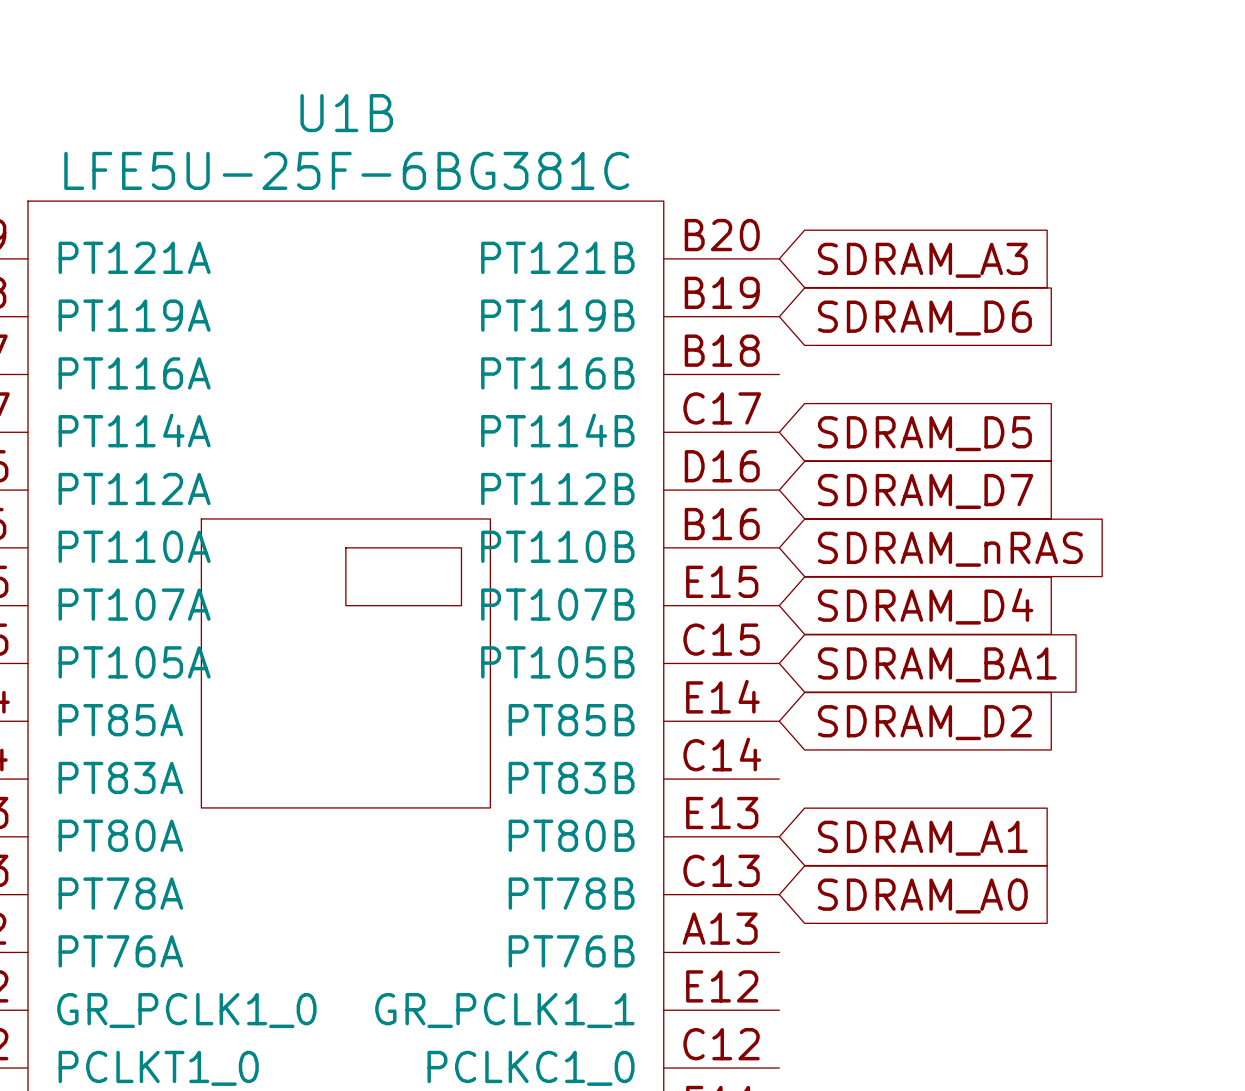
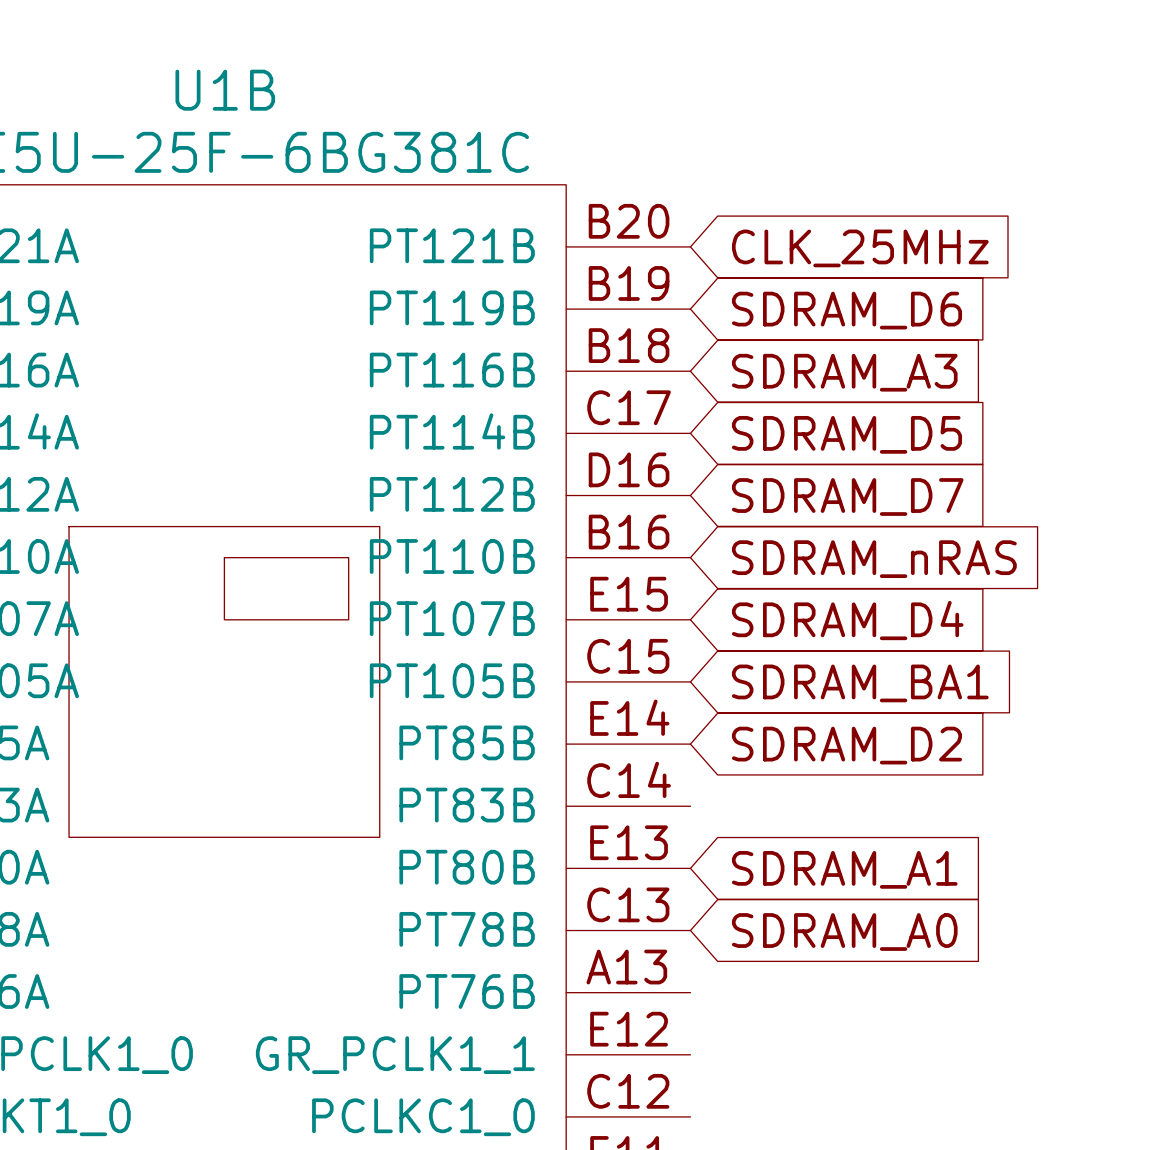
global label: SDRAM_A3 (922, 260) -> CLK_25MHz (860, 248)
global label: none -> SDRAM_A3 (844, 372)

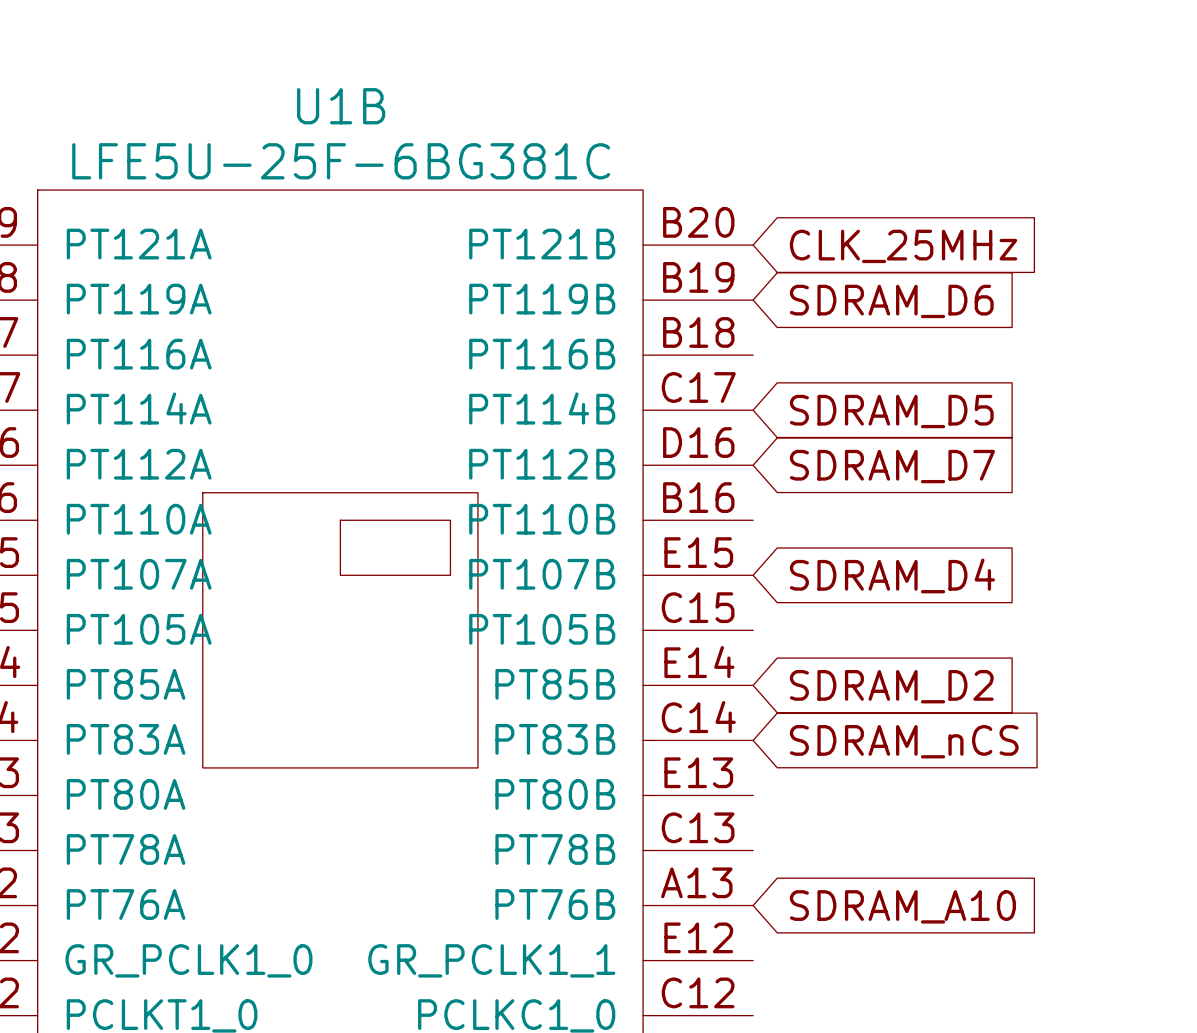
global label: SDRAM_A3 (844, 372) -> none
global label: SDRAM_nRAS (874, 559) -> none
global label: SDRAM_BA1 (860, 683) -> none
global label: SDRAM_A1 (844, 869) -> SDRAM_nCS (904, 741)
global label: SDRAM_A0 (844, 932) -> SDRAM_A10 (902, 906)

